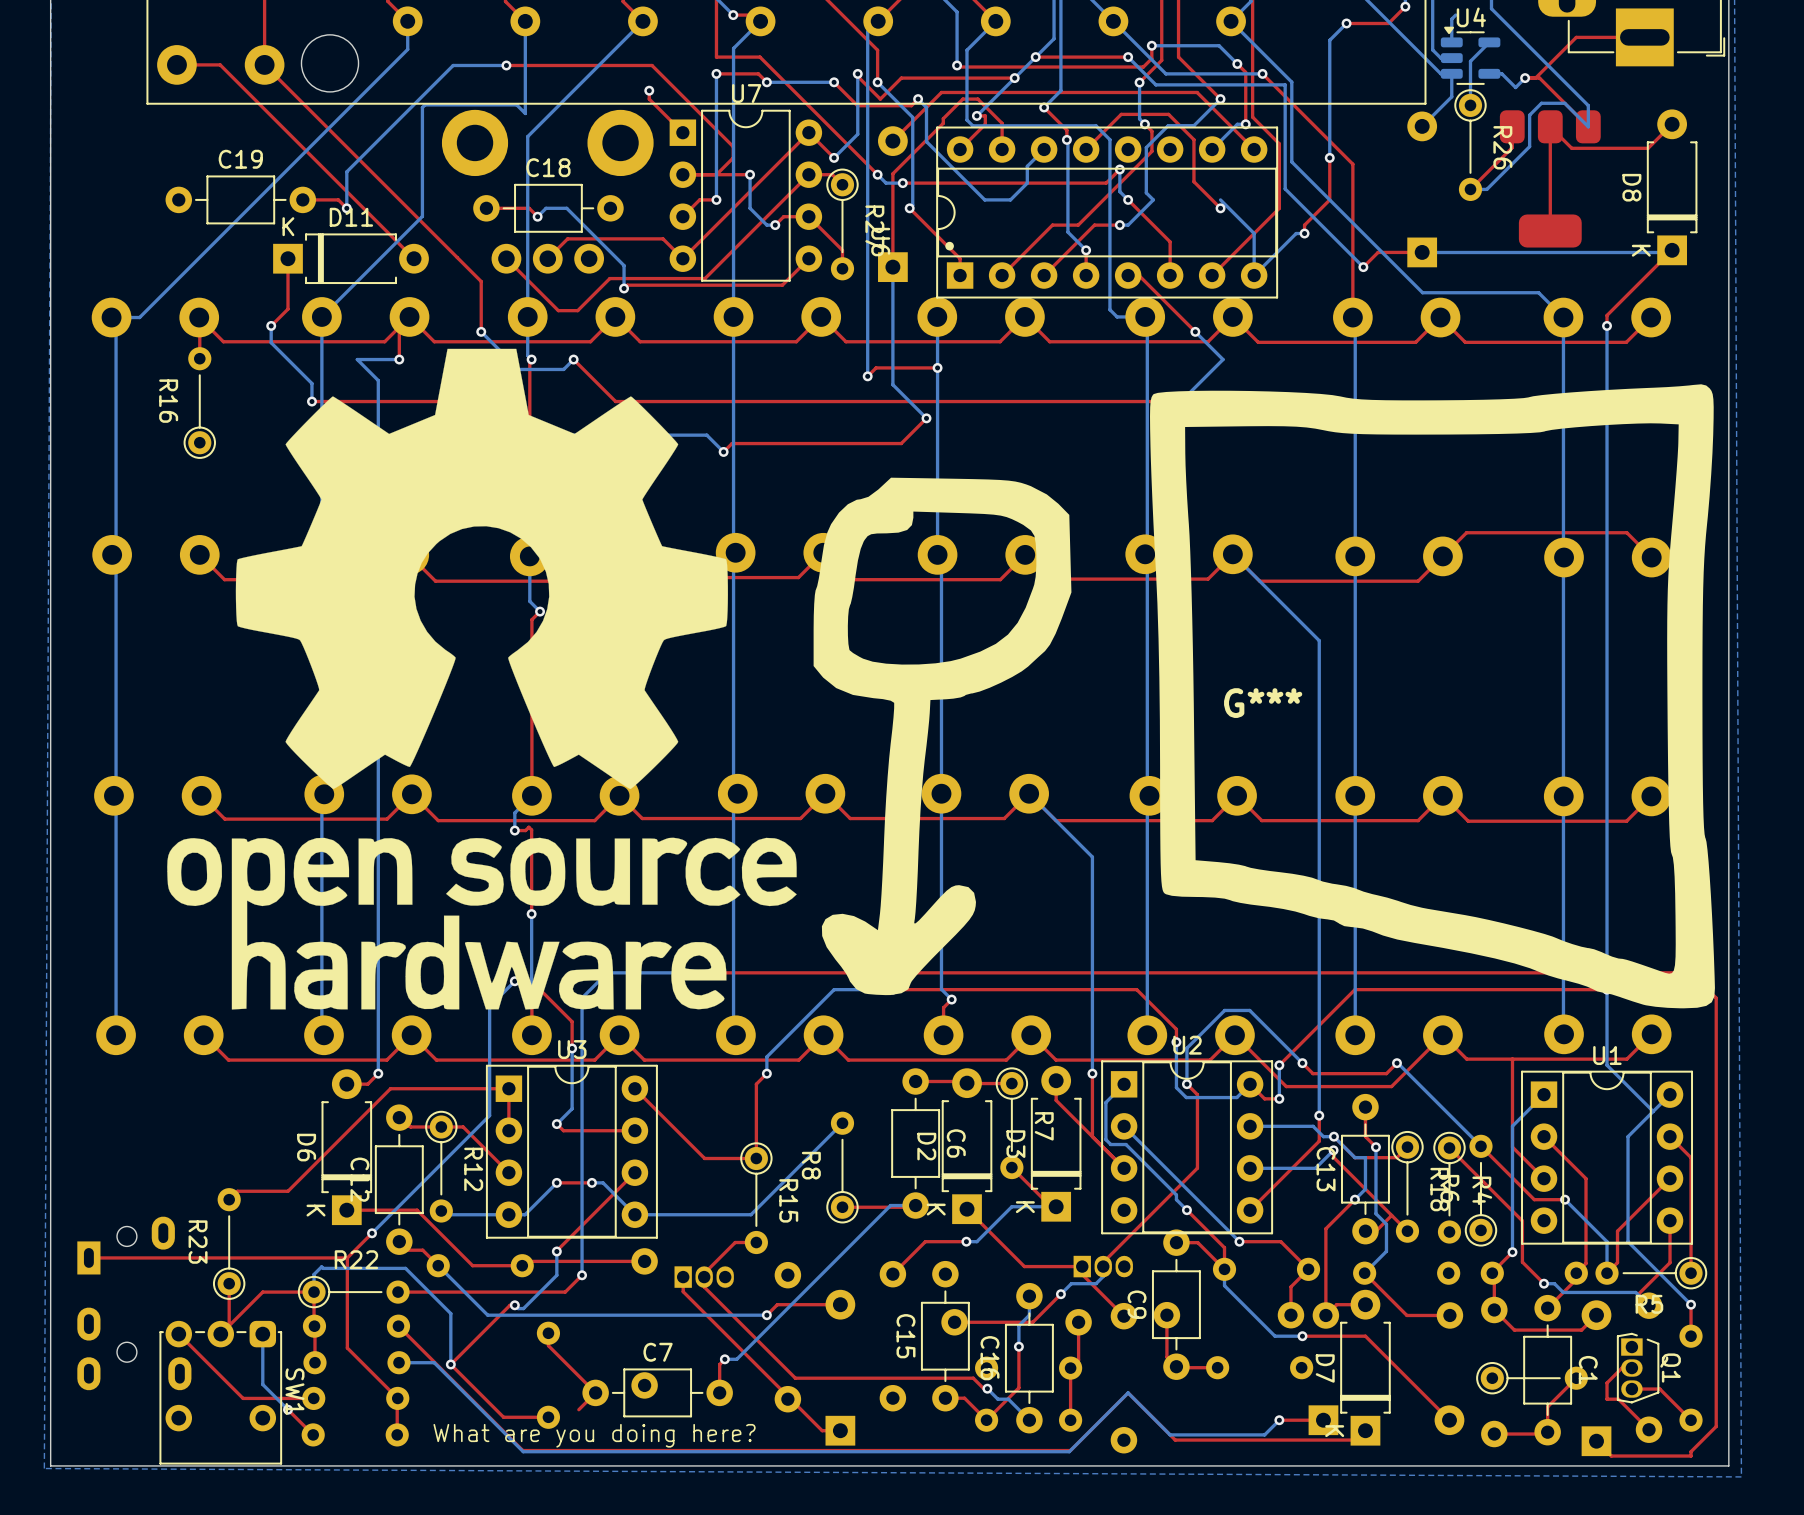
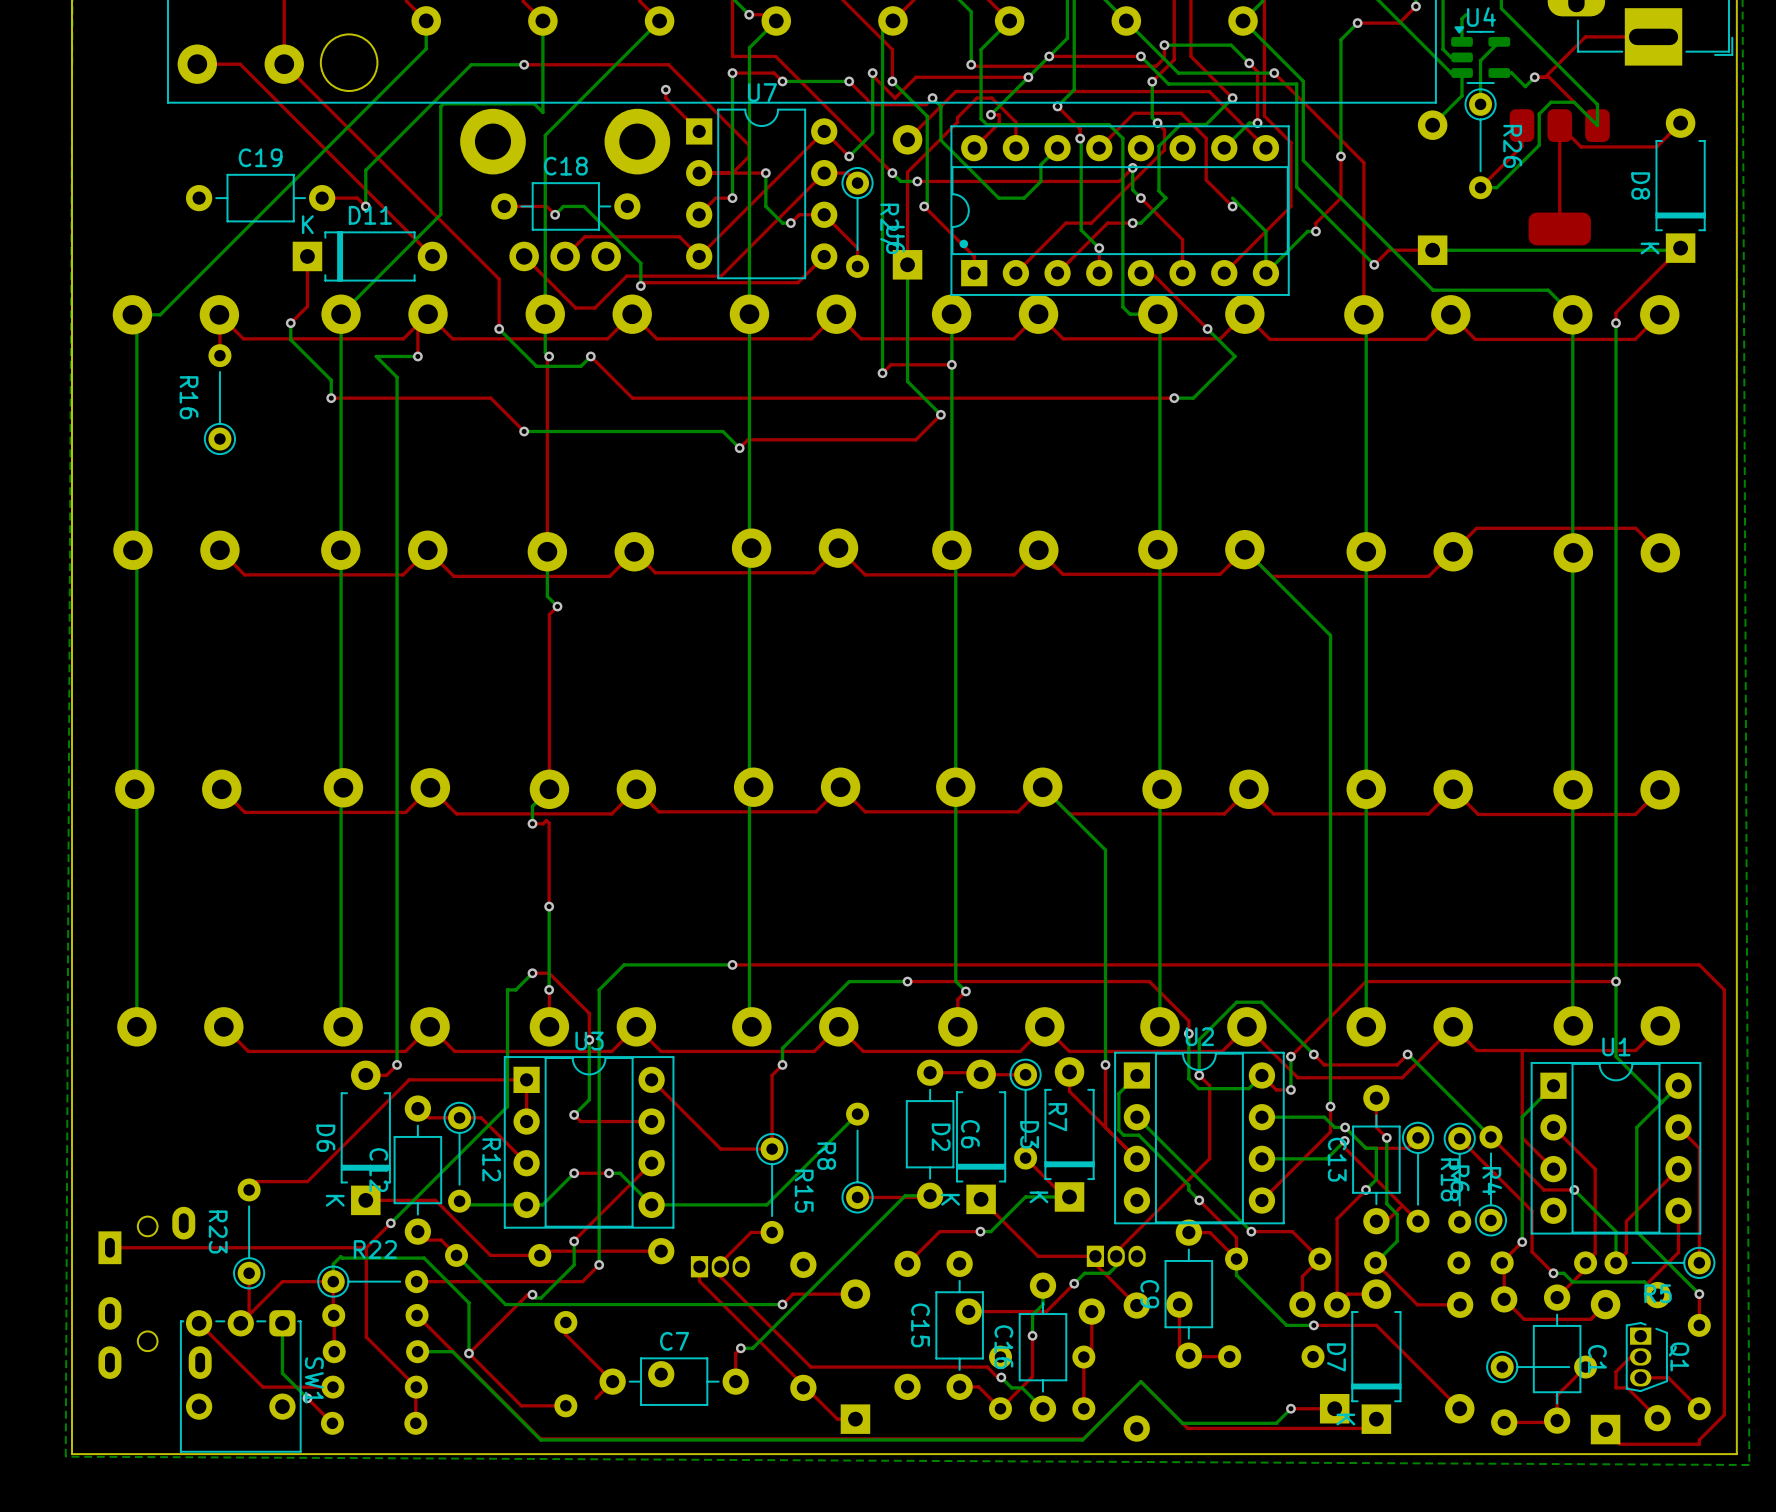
drawing: [167, 348, 797, 1010] -> none
G***: (1264, 696) -> none
text: What are you doing here? (594, 1435) -> none

